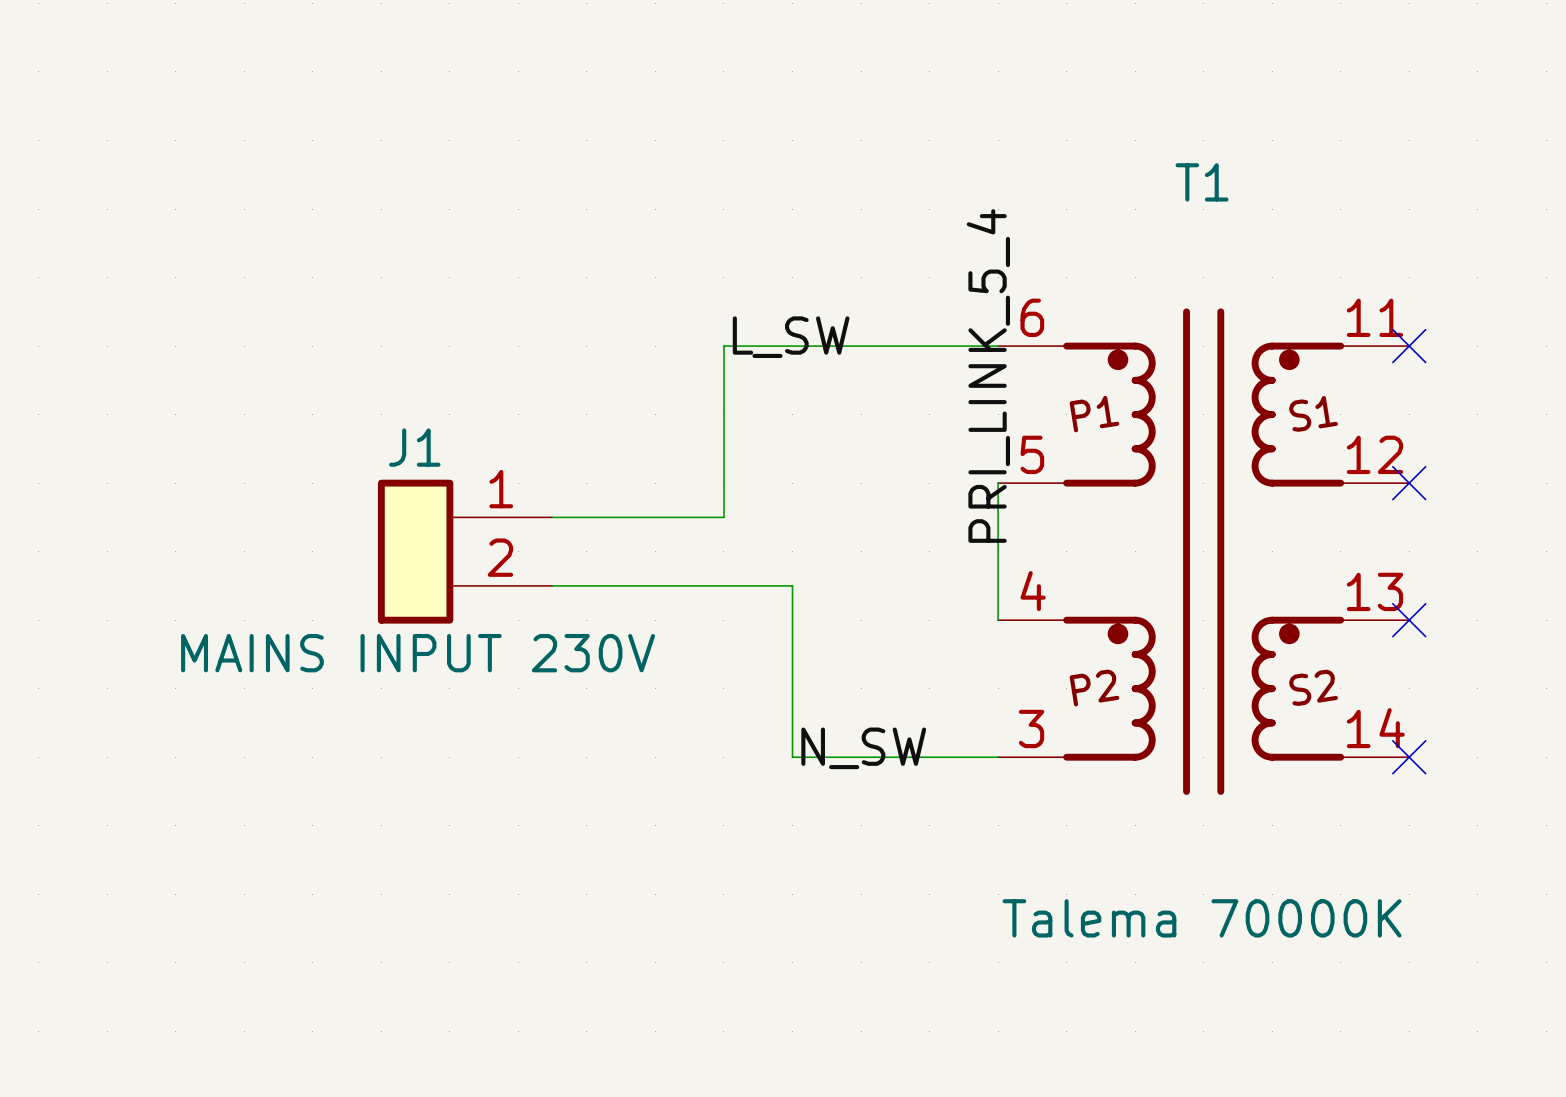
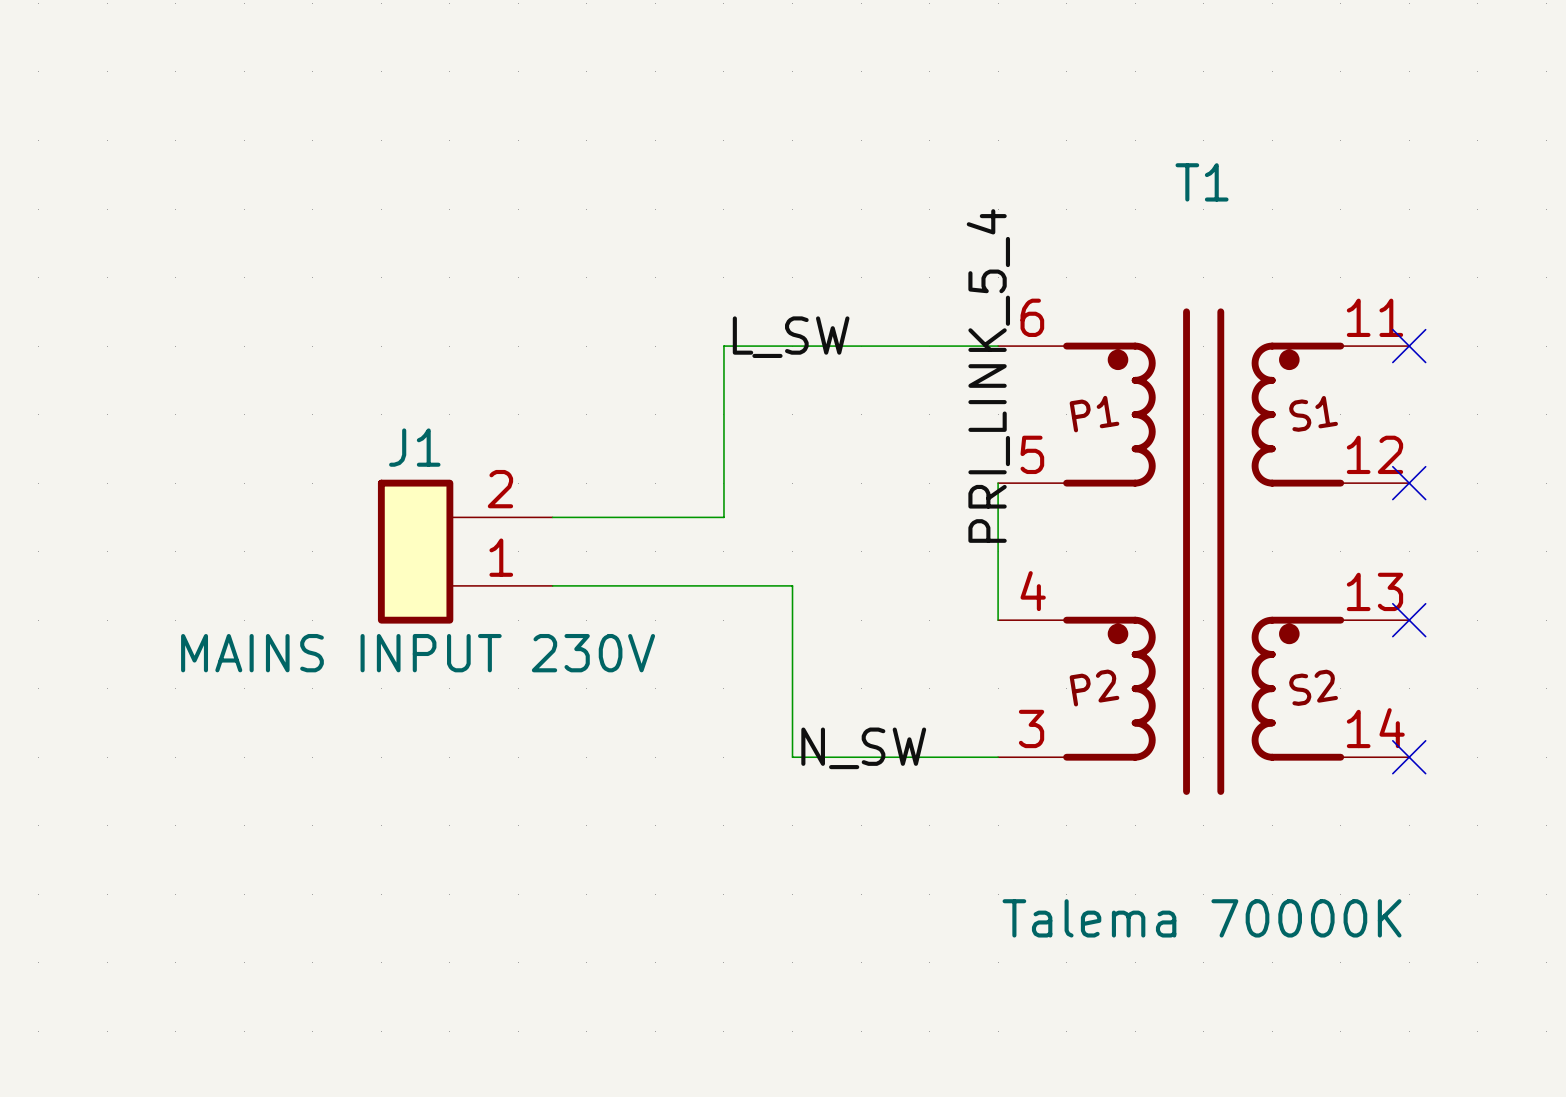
J1 flip: as is (415, 551) -> up-down (415, 551)

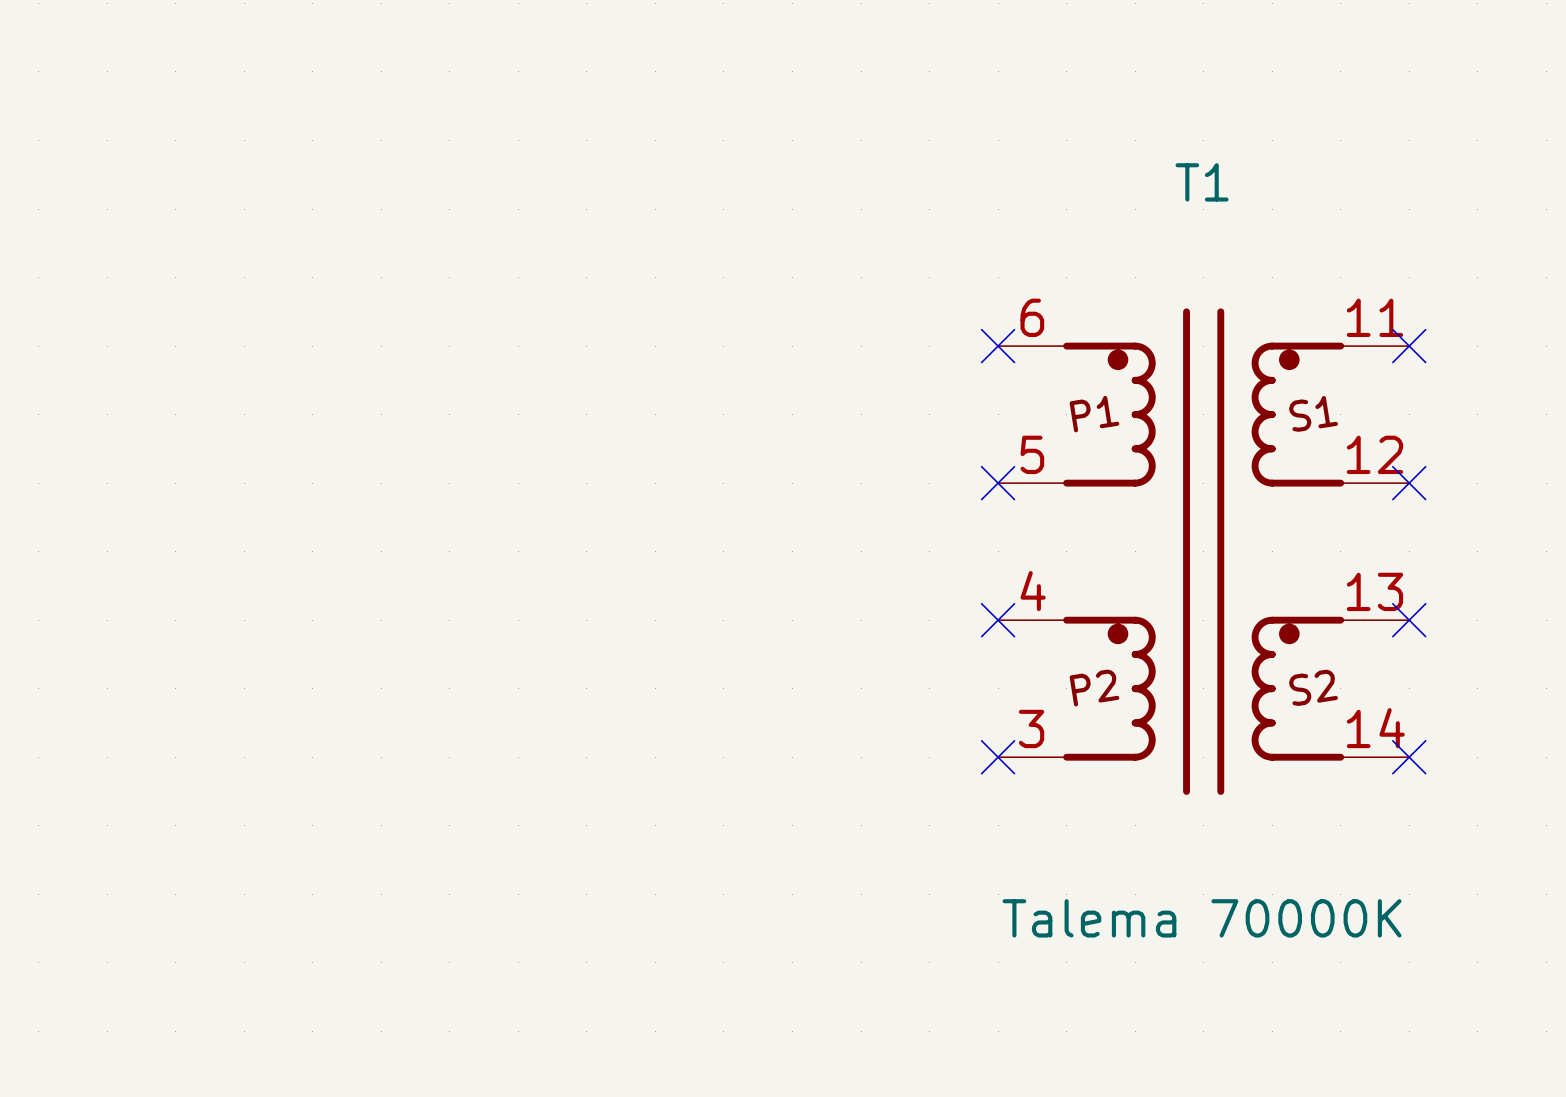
label: L_SW (791, 337) -> none
wire: (998, 346) (723, 346) (723, 517) (552, 517) -> none
no-connect mark: none -> (998, 346)
label: PRI_LINK_5_4 (988, 376) -> none
wire: (998, 483) (998, 620) -> none
no-connect mark: none -> (998, 483)
J1: MAINS INPUT 230V (465, 551) -> none
wire: (552, 585) (792, 585) (792, 757) (998, 757) -> none
no-connect mark: none -> (998, 620)
label: N_SW (863, 748) -> none
no-connect mark: none -> (998, 757)

